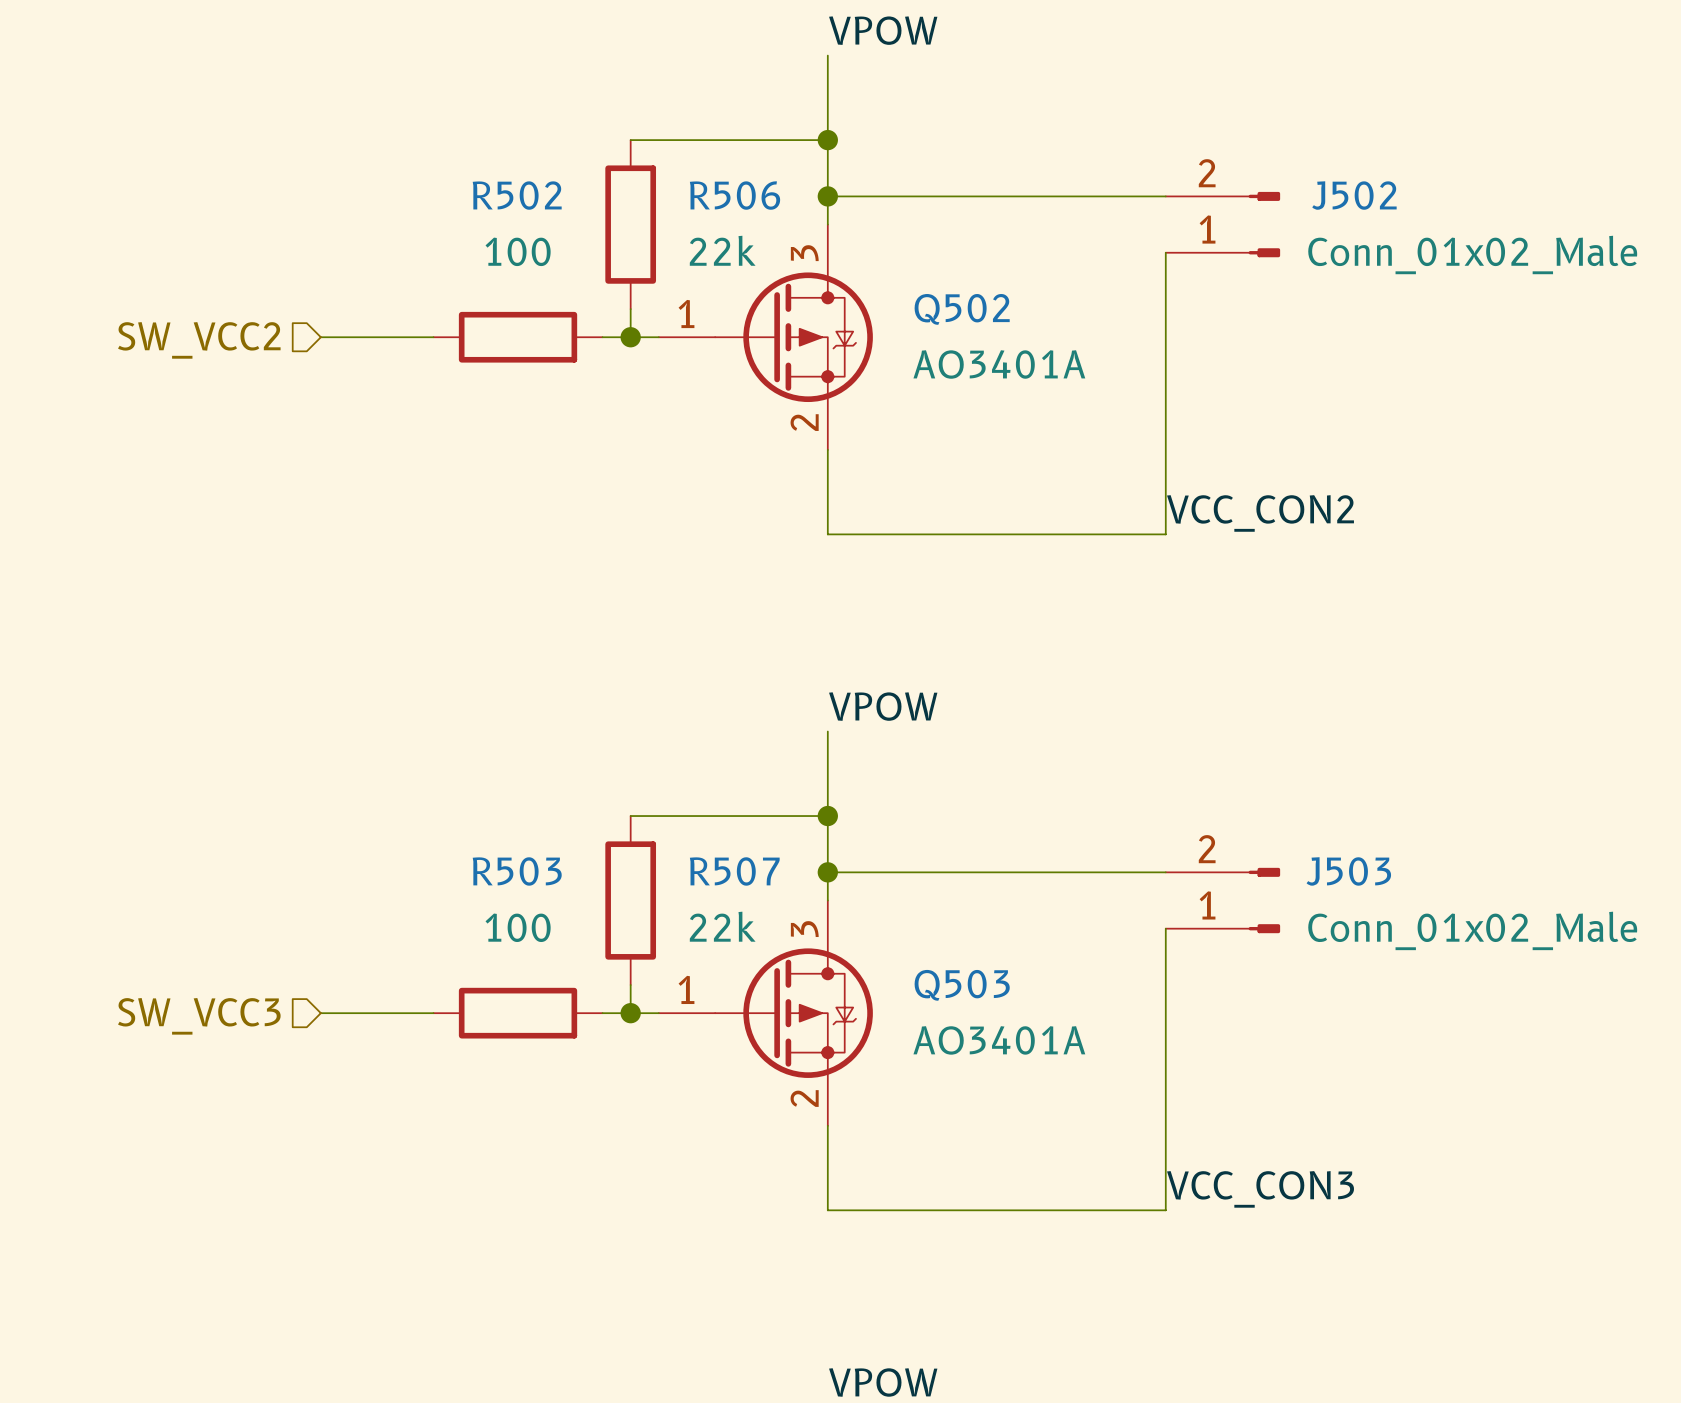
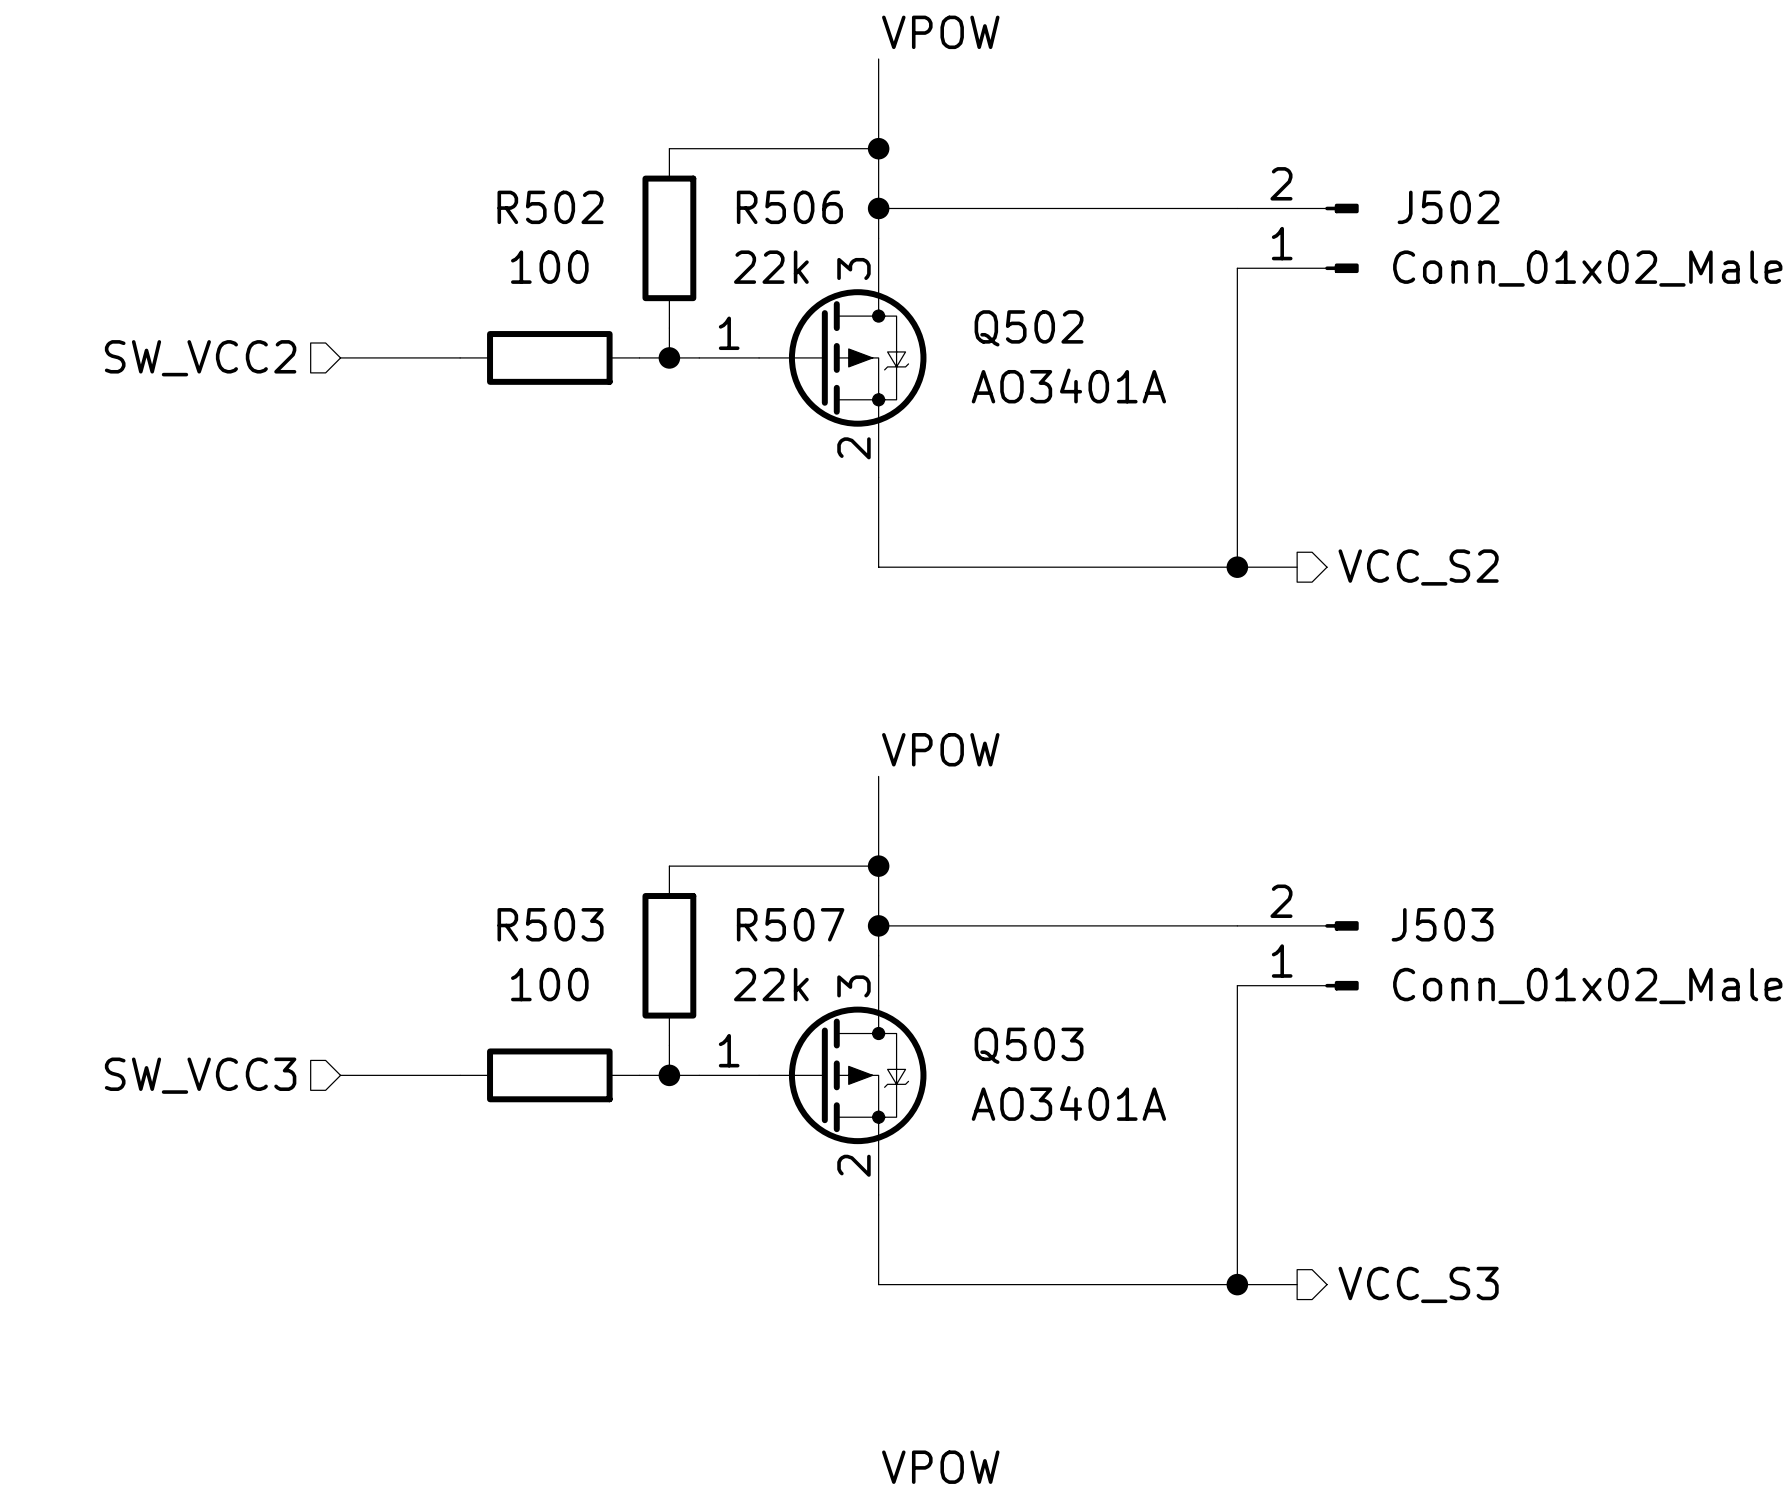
label: VCC_CON2 (1260, 513) -> none
wire: none -> (1237, 567) (1297, 567)
junction: none -> (1237, 567)
hierarchical label: none -> VCC_S2 (1418, 567)
label: VCC_CON3 (1260, 1189) -> none
wire: none -> (1237, 1284) (1297, 1284)
junction: none -> (1237, 1284)
hierarchical label: none -> VCC_S3 (1418, 1284)

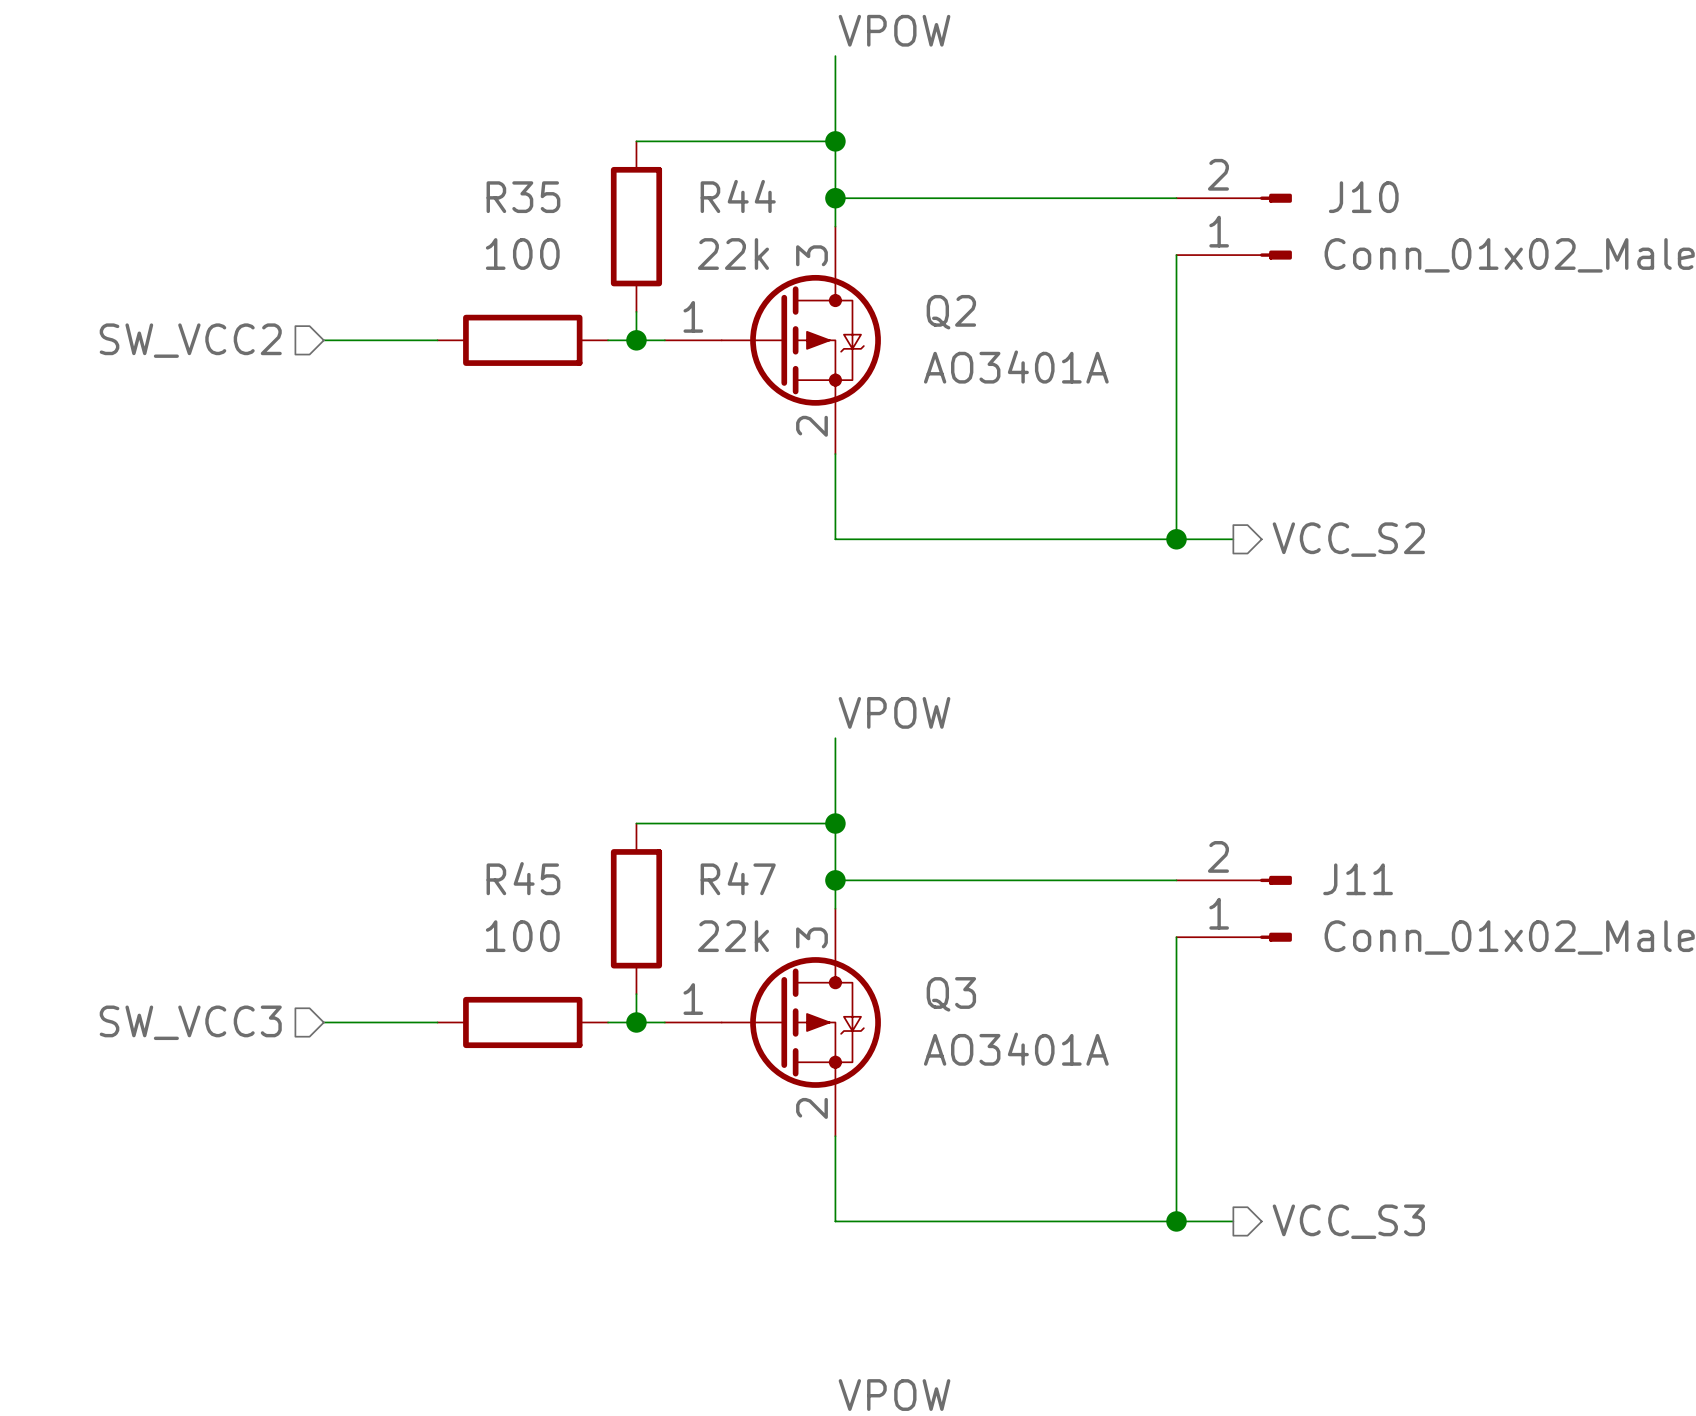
R502 name: R502 (550, 207) -> R35 (523, 197)
R506 name: R506 (789, 207) -> R44 (738, 196)
J502 name: J502 (1448, 207) -> J10 (1363, 197)
Q502 name: Q502 (1029, 328) -> Q2 (951, 312)
R503 name: R503 (550, 924) -> R45 (523, 878)
R507 name: R507 (790, 924) -> R47 (738, 878)
J503 name: J503 (1442, 924) -> J11 (1358, 879)
Q503 name: Q503 (1029, 1045) -> Q3 (951, 994)

